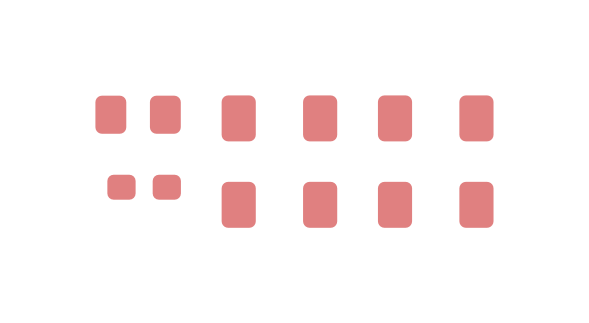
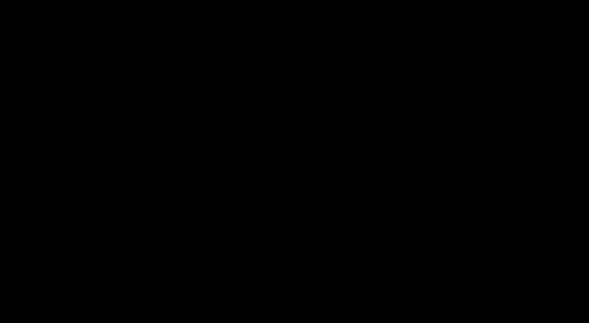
part: (138, 114) -> none
part: (279, 118) -> none
part: (435, 118) -> none
part: (144, 187) -> none
part: (279, 204) -> none
part: (435, 204) -> none

